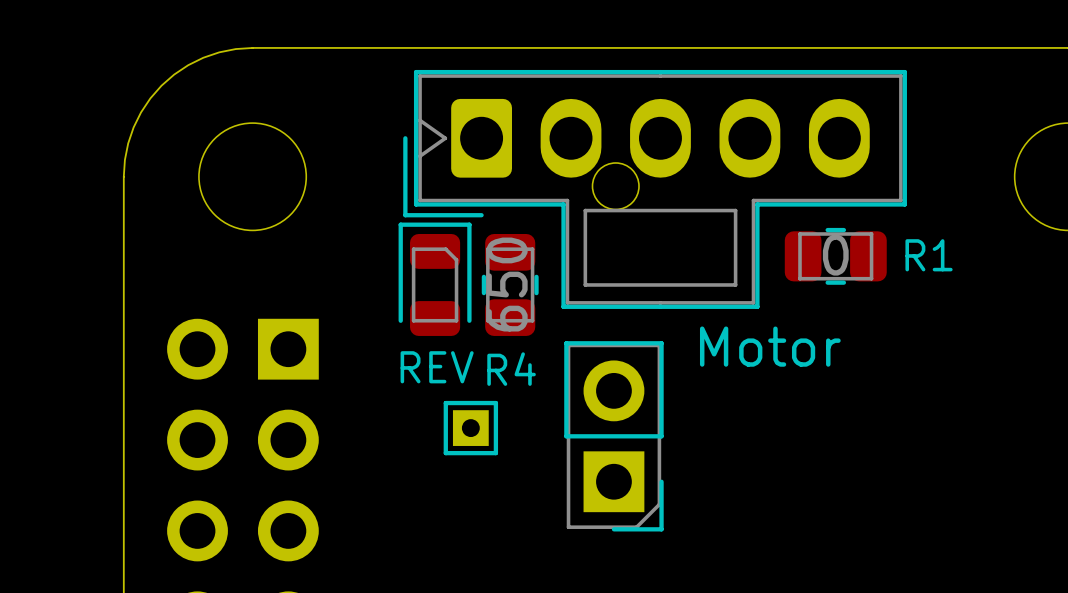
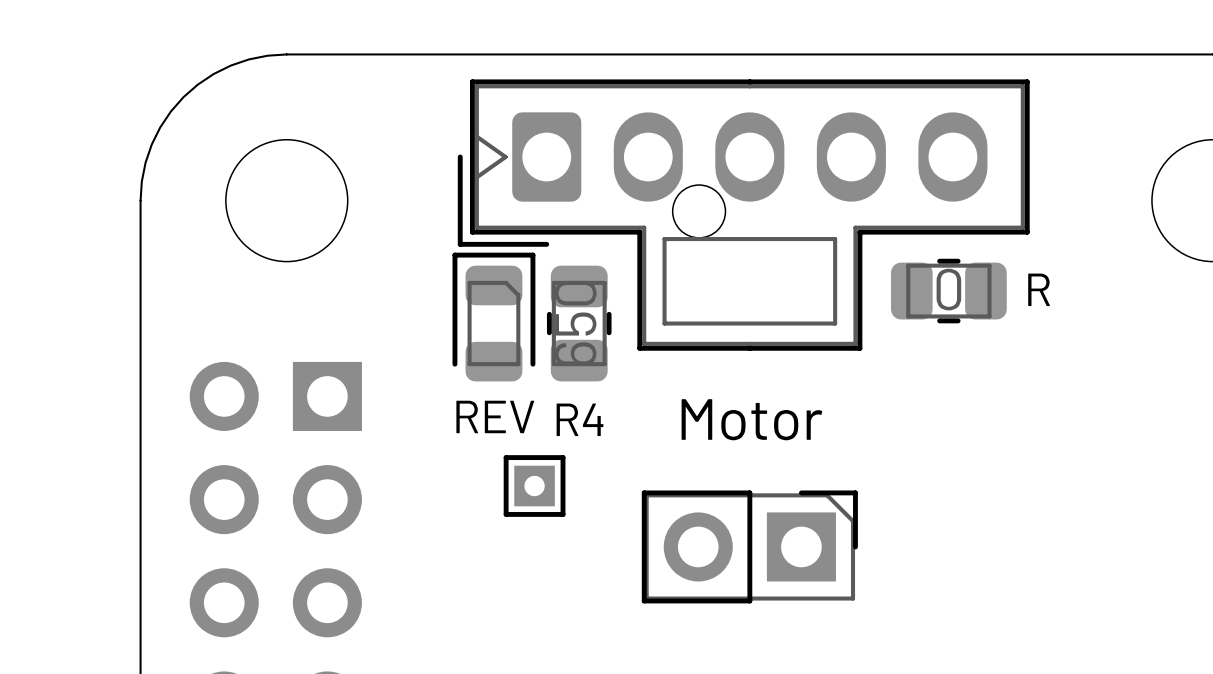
R1 name: R1 (929, 255) -> R (1039, 289)
Motor name position: Motor (770, 346) -> Motor (751, 419)
Motor rotation: 0° (613, 436) -> 90° counterclockwise (749, 546)

